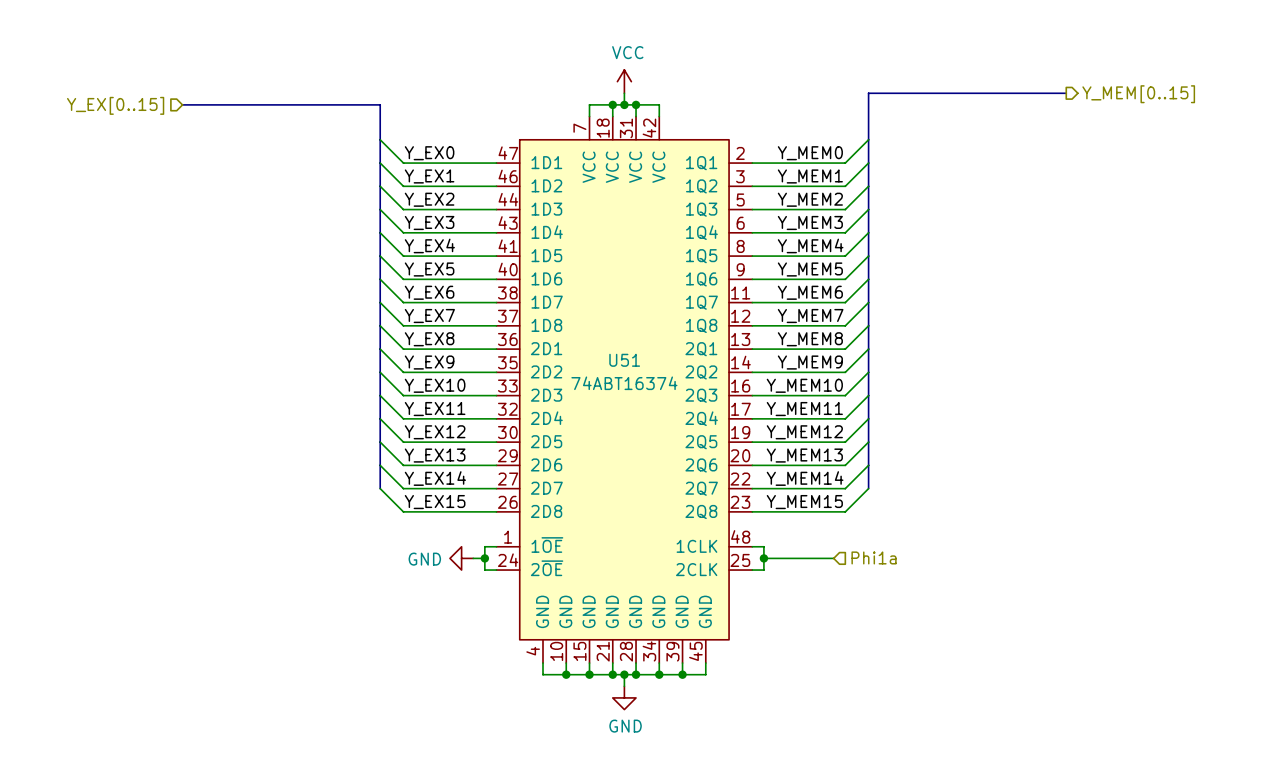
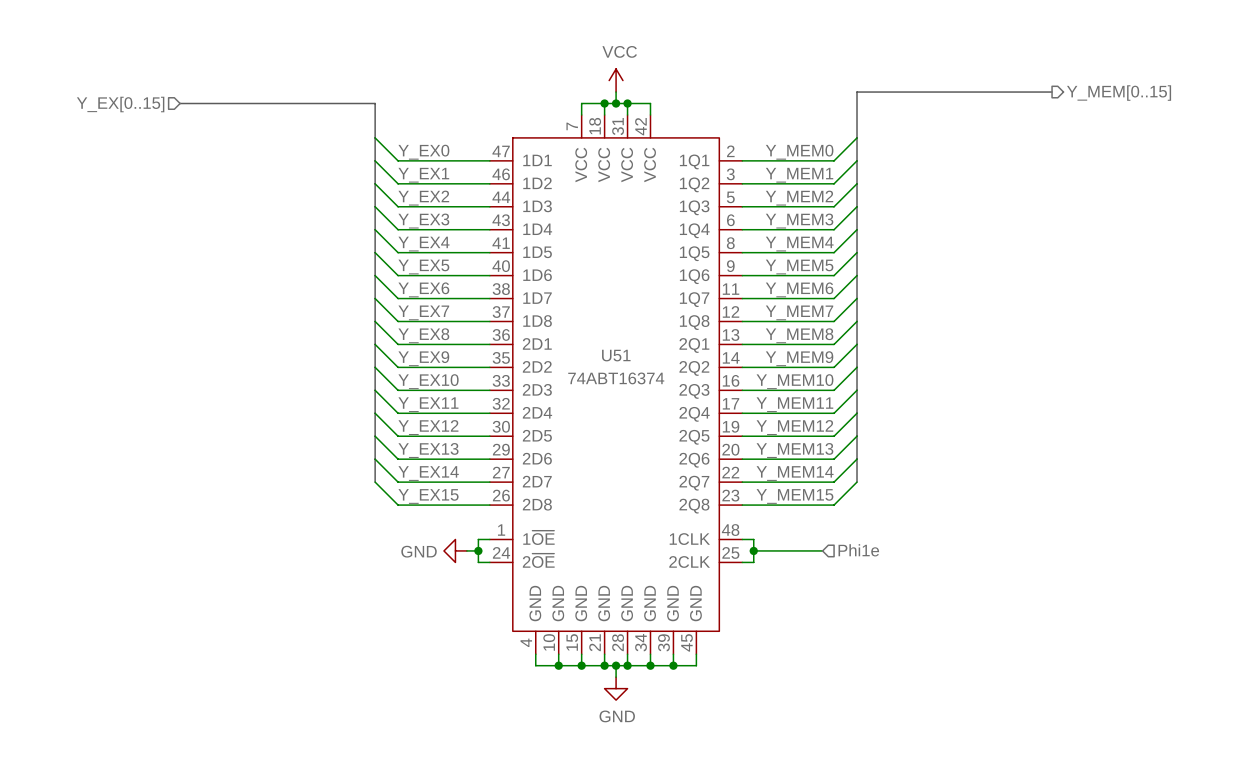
hierarchical label: Phi1a (874, 557) -> Phi1e (858, 550)

